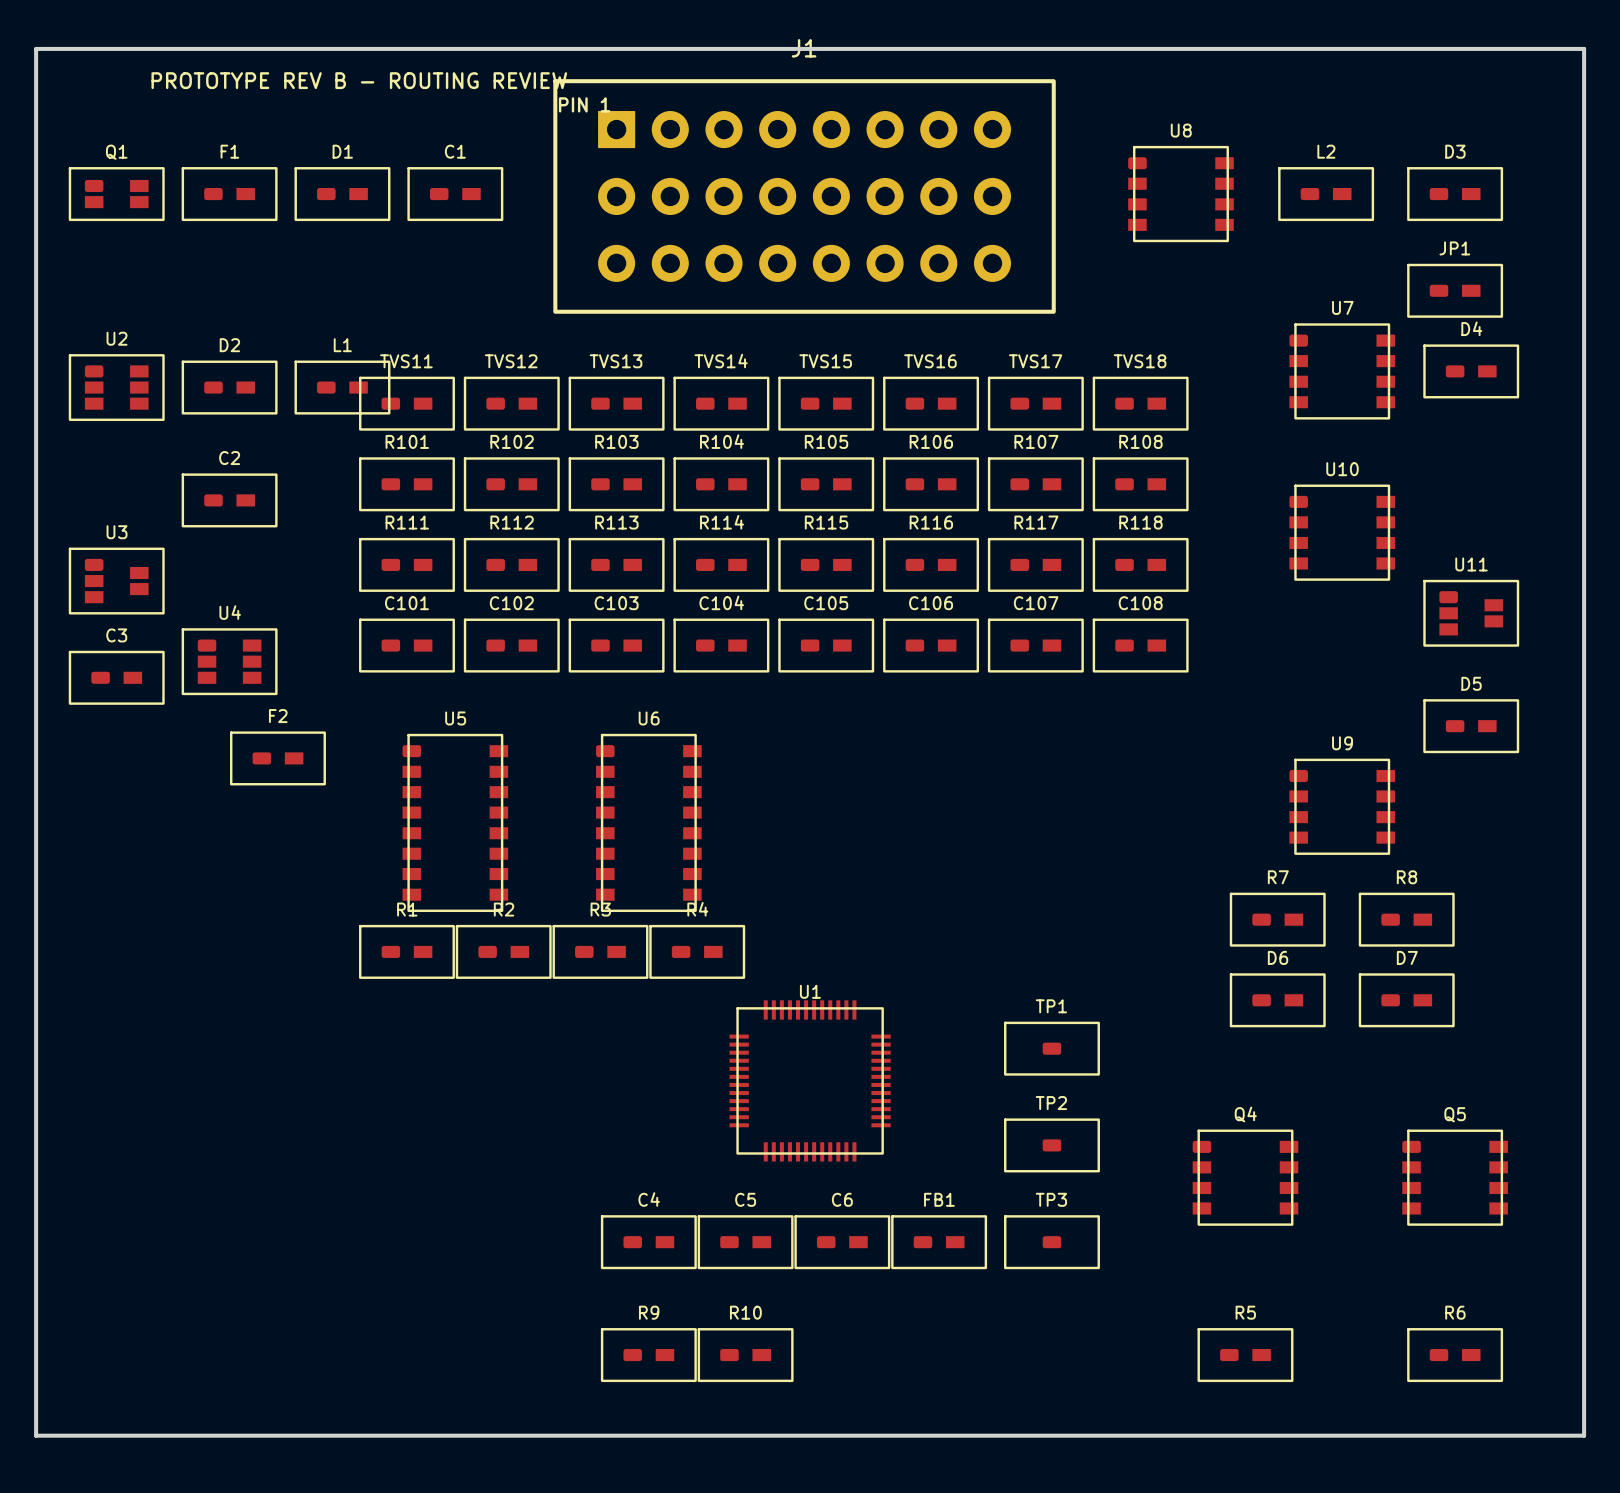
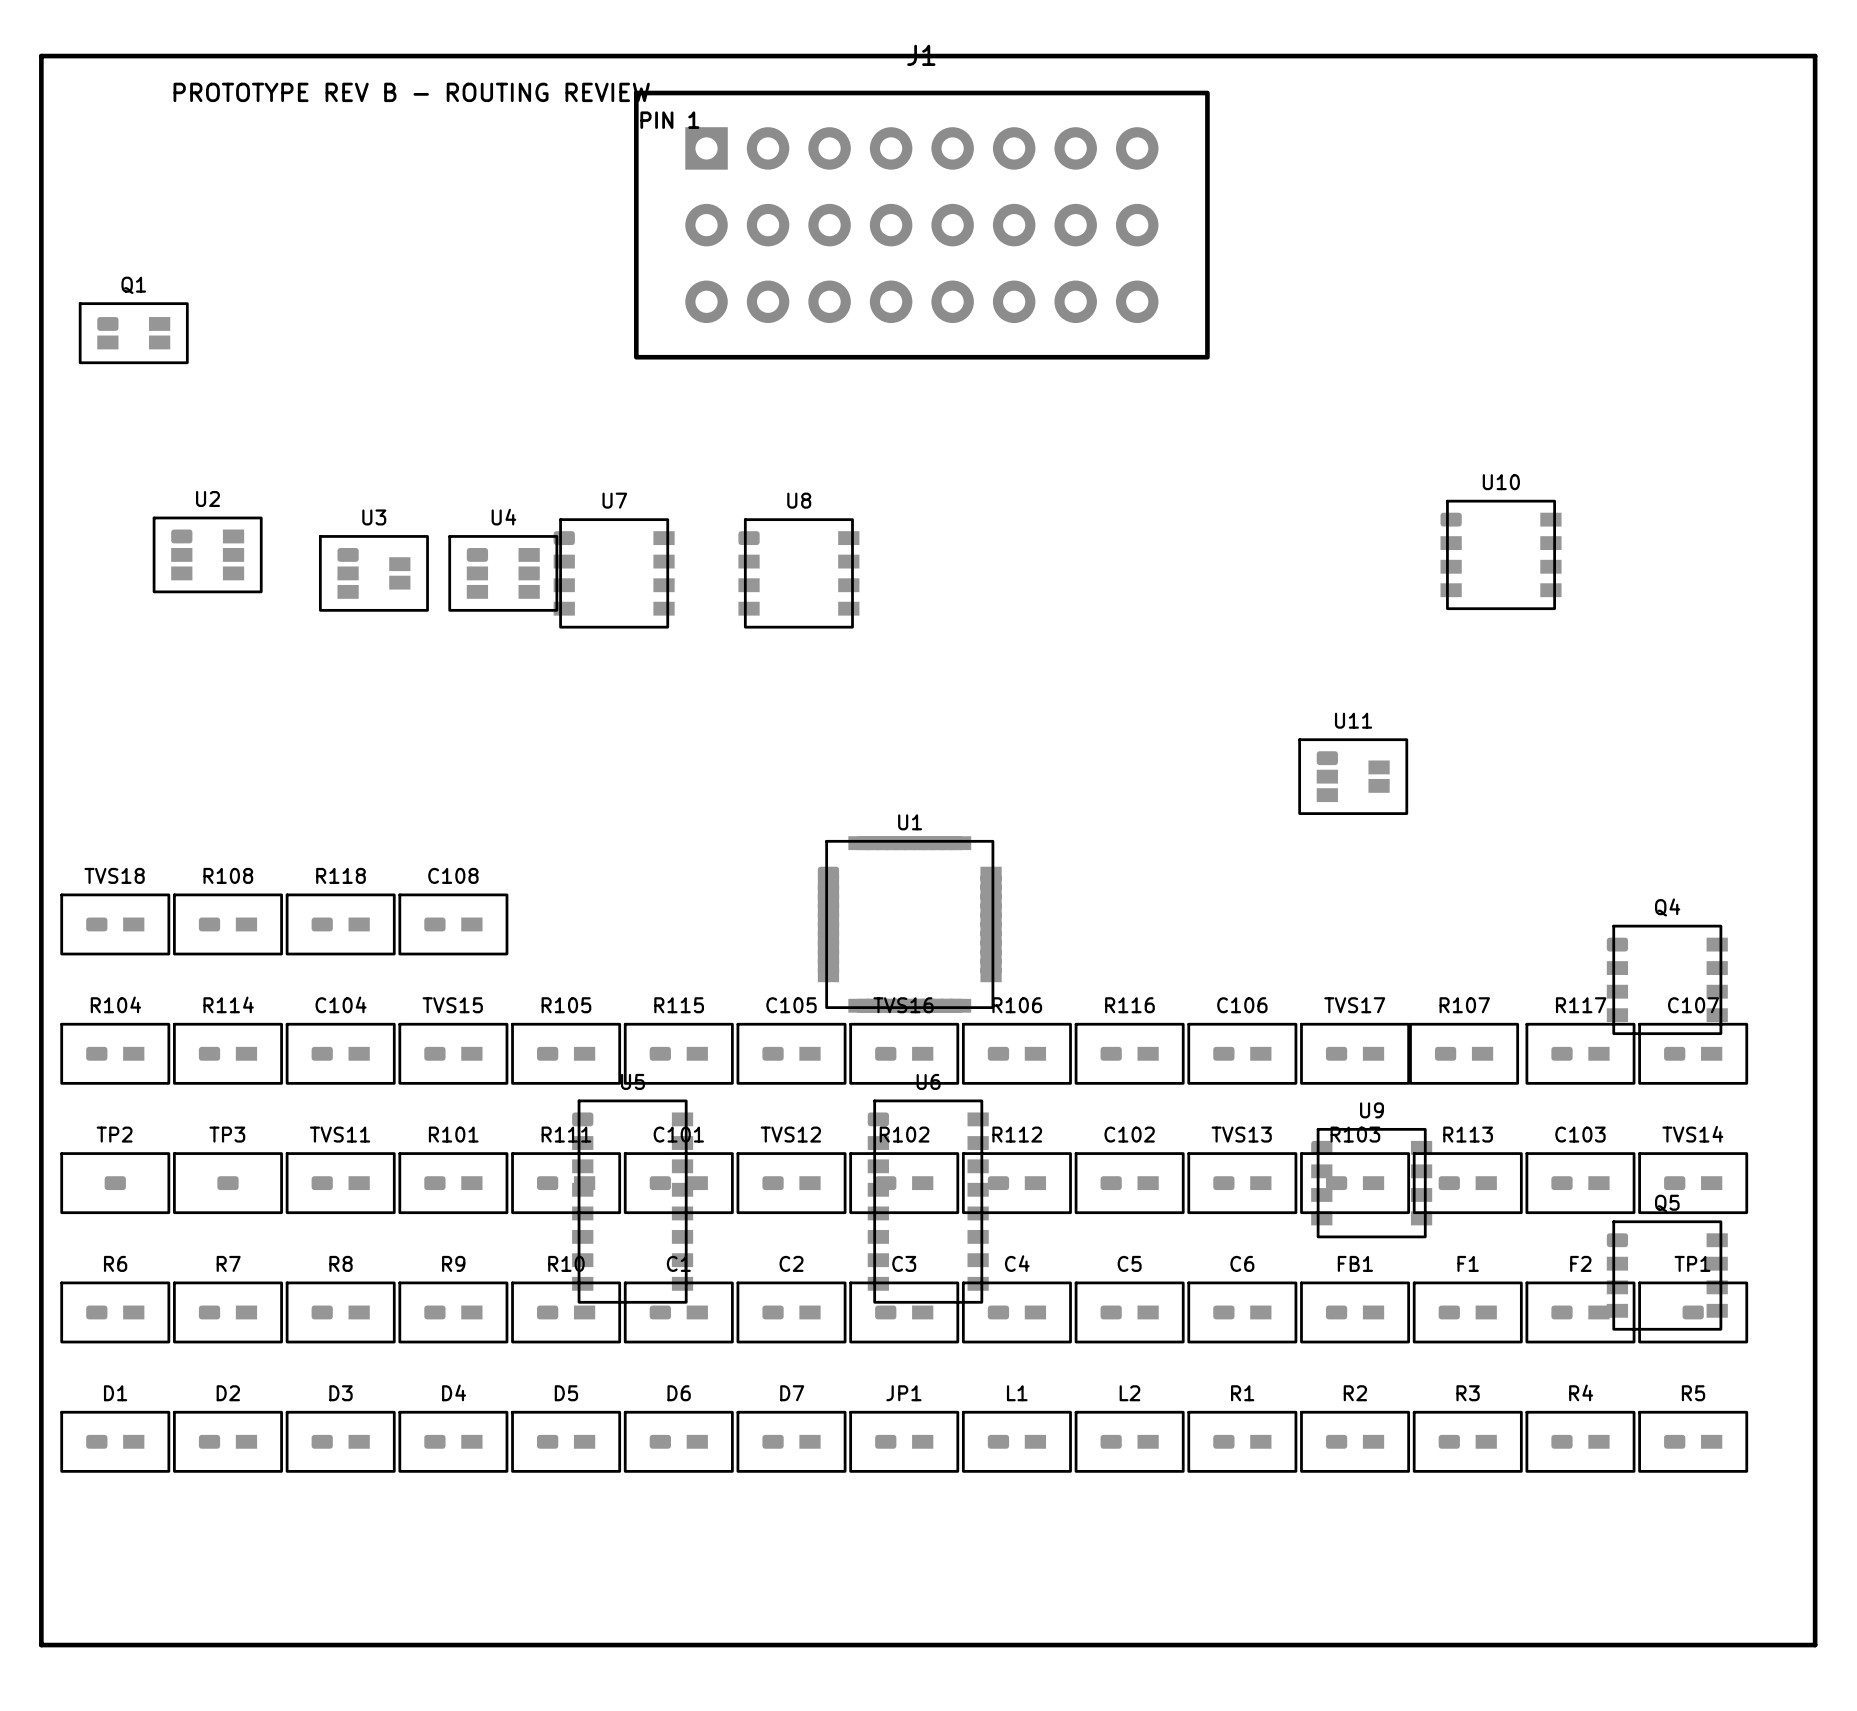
Q1 position: (116, 194) -> (133, 333)
F1 position: (229, 194) -> (1467, 1312)
D1 position: (342, 194) -> (115, 1441)
C1 position: (455, 194) -> (678, 1312)
U8 position: (1180, 194) -> (798, 573)
L2 position: (1326, 194) -> (1129, 1441)
D3 position: (1455, 194) -> (340, 1441)
JP1 position: (1455, 290) -> (904, 1441)
U7 position: (1342, 371) -> (614, 573)
D4 position: (1471, 371) -> (453, 1441)
U2 position: (116, 387) -> (207, 554)
D2 position: (229, 387) -> (227, 1441)
L1 position: (342, 387) -> (1016, 1441)
TVS11 position: (406, 403) -> (340, 1183)
TVS12 position: (511, 403) -> (791, 1183)
TVS13 position: (616, 403) -> (1242, 1183)
TVS14 position: (721, 403) -> (1693, 1183)
TVS15 position: (826, 403) -> (453, 1053)
TVS16 position: (931, 403) -> (904, 1053)
TVS17 position: (1035, 403) -> (1355, 1053)
TVS18 position: (1140, 403) -> (115, 924)
R101 position: (406, 484) -> (453, 1183)
R102 position: (511, 484) -> (904, 1183)
R103 position: (616, 484) -> (1355, 1183)
R104 position: (721, 484) -> (115, 1053)
R105 position: (826, 484) -> (566, 1053)
R106 position: (931, 484) -> (1016, 1053)
R107: (1035, 484) -> none
R108 position: (1140, 484) -> (227, 924)
C2 position: (229, 500) -> (791, 1312)
U10 position: (1342, 532) -> (1501, 554)
R111 position: (406, 564) -> (566, 1183)
R112 position: (511, 564) -> (1016, 1183)
R113 position: (616, 564) -> (1467, 1183)
R114 position: (721, 564) -> (227, 1053)
R115 position: (826, 564) -> (678, 1053)
R116 position: (931, 564) -> (1129, 1053)
R117 position: (1035, 564) -> (1580, 1053)
R118 position: (1140, 564) -> (340, 924)
U3 position: (116, 581) -> (373, 573)
U11 position: (1471, 613) -> (1353, 776)
C101 position: (406, 645) -> (678, 1183)
C102 position: (511, 645) -> (1129, 1183)
C103 position: (616, 645) -> (1580, 1183)
C104 position: (721, 645) -> (340, 1053)
C105 position: (826, 645) -> (791, 1053)
C106 position: (931, 645) -> (1242, 1053)
C107 position: (1035, 645) -> (1693, 1053)
C108 position: (1140, 645) -> (453, 924)
U4 position: (229, 661) -> (503, 573)
C3 position: (116, 677) -> (904, 1312)
D5 position: (1471, 726) -> (566, 1441)
F2 position: (277, 758) -> (1580, 1312)
U9 position: (1342, 806) -> (1371, 1183)
U5 position: (455, 822) -> (632, 1201)
U6 position: (648, 822) -> (928, 1201)
R7 name: R7 (1278, 877) -> R107 (1464, 1005)
R8 position: (1406, 919) -> (340, 1312)
R1 position: (406, 951) -> (1242, 1441)
R2 position: (503, 951) -> (1355, 1441)
R3 position: (600, 951) -> (1467, 1441)
R4 position: (697, 951) -> (1580, 1441)
U1 footprint: [729, 1000, 891, 1162] -> [817, 836, 1002, 1013]
D6 position: (1277, 1000) -> (678, 1441)
D7 position: (1406, 1000) -> (791, 1441)
TP1 position: (1051, 1048) -> (1693, 1312)
R7: none -> (227, 1312)
TP2 position: (1051, 1145) -> (115, 1183)
Q4 position: (1245, 1177) -> (1667, 979)
Q5 position: (1455, 1177) -> (1667, 1275)
C4 position: (648, 1242) -> (1016, 1312)
C5 position: (745, 1242) -> (1129, 1312)
C6 position: (842, 1242) -> (1242, 1312)
FB1 position: (939, 1242) -> (1355, 1312)
TP3 position: (1051, 1242) -> (227, 1183)
R9 position: (648, 1355) -> (453, 1312)
R10 position: (745, 1355) -> (566, 1312)
R5 position: (1245, 1355) -> (1693, 1441)
R6 position: (1455, 1355) -> (115, 1312)

